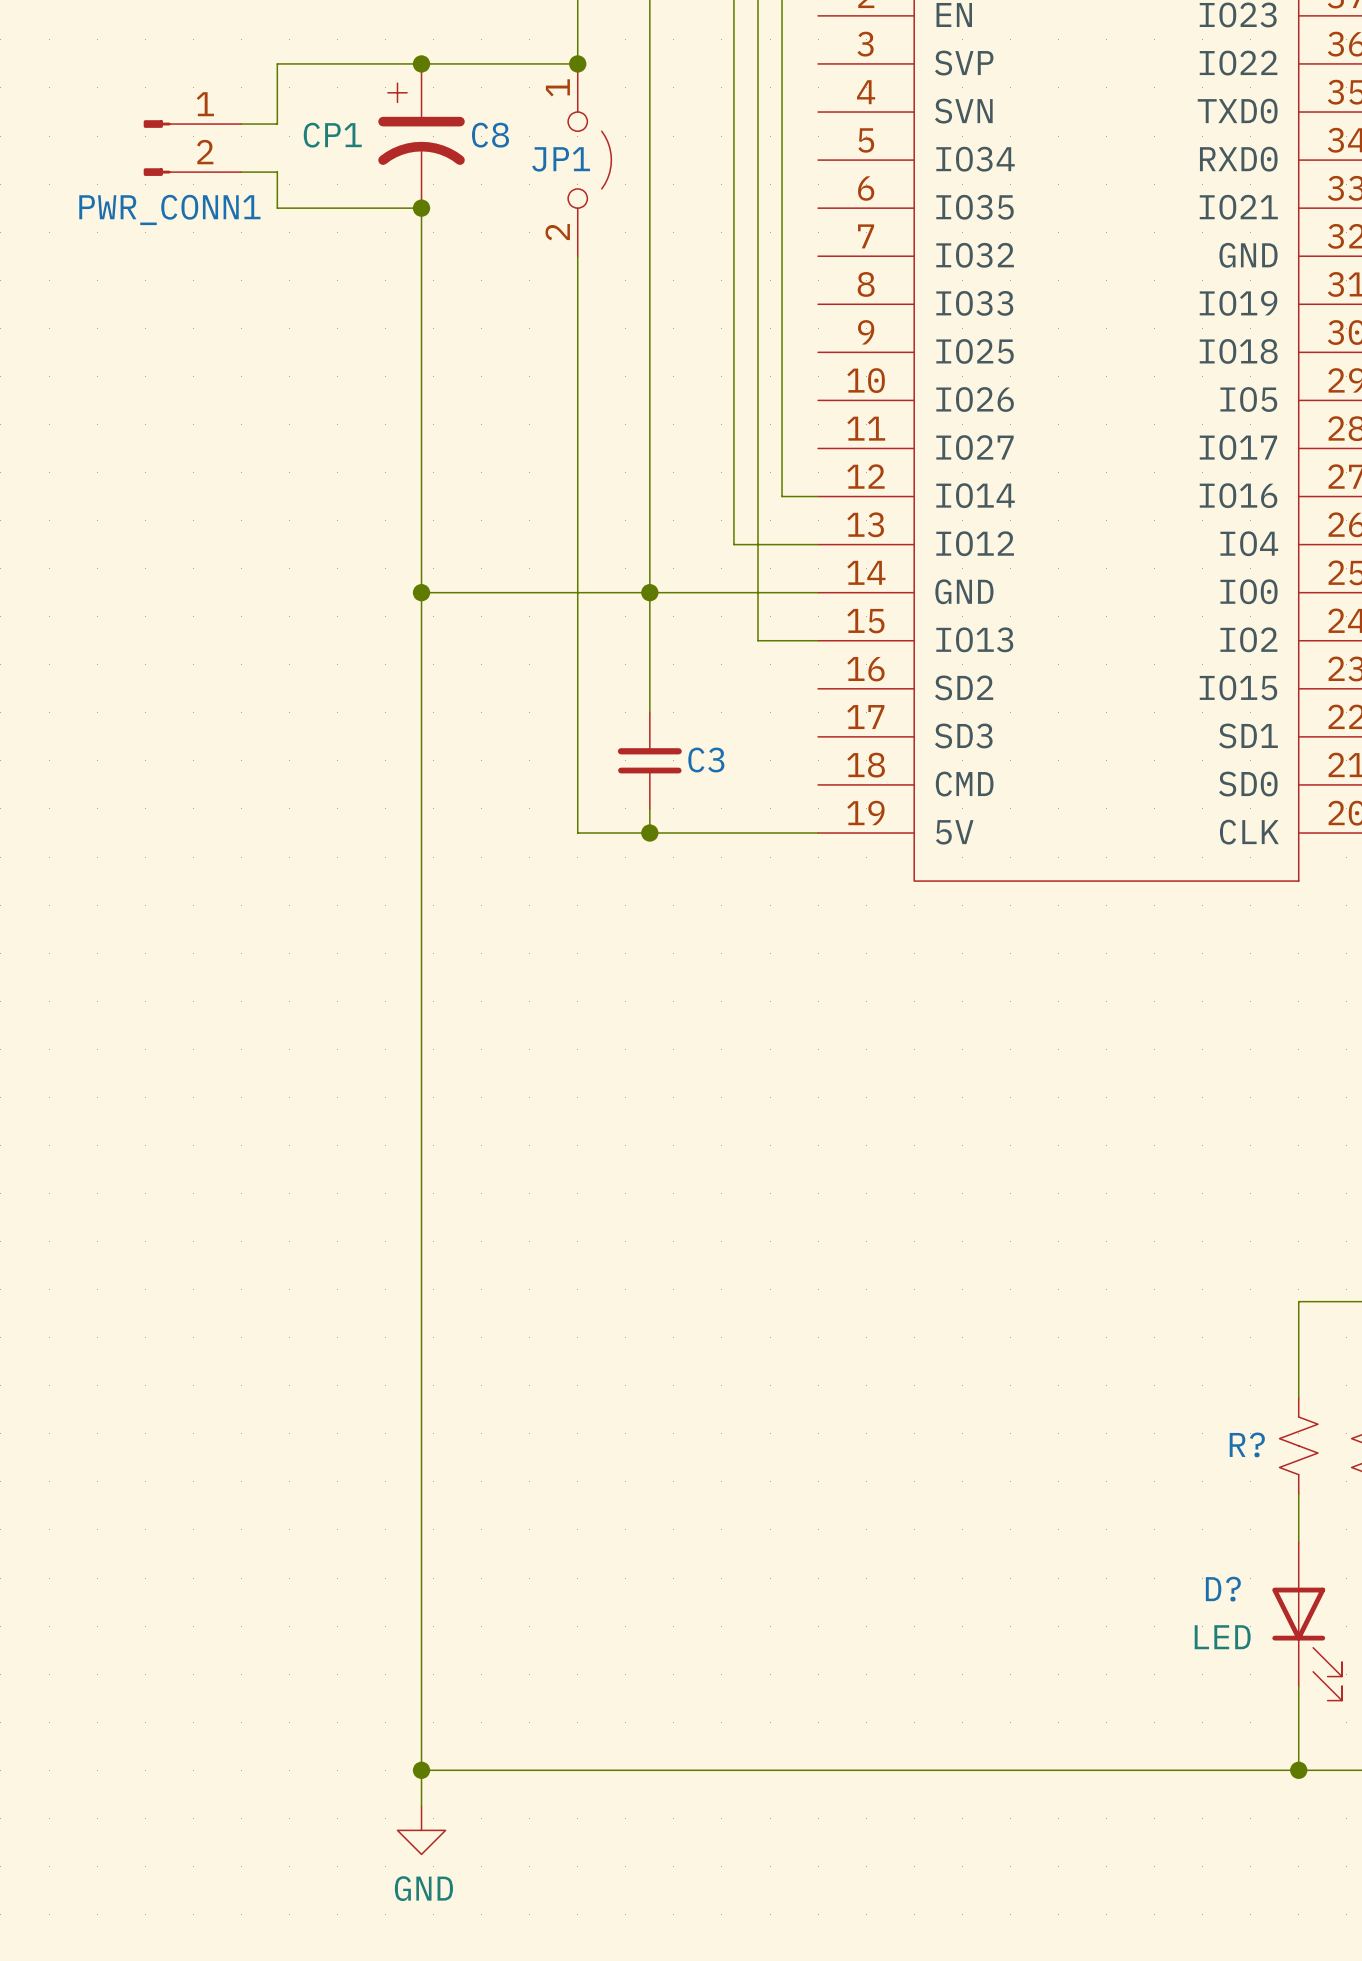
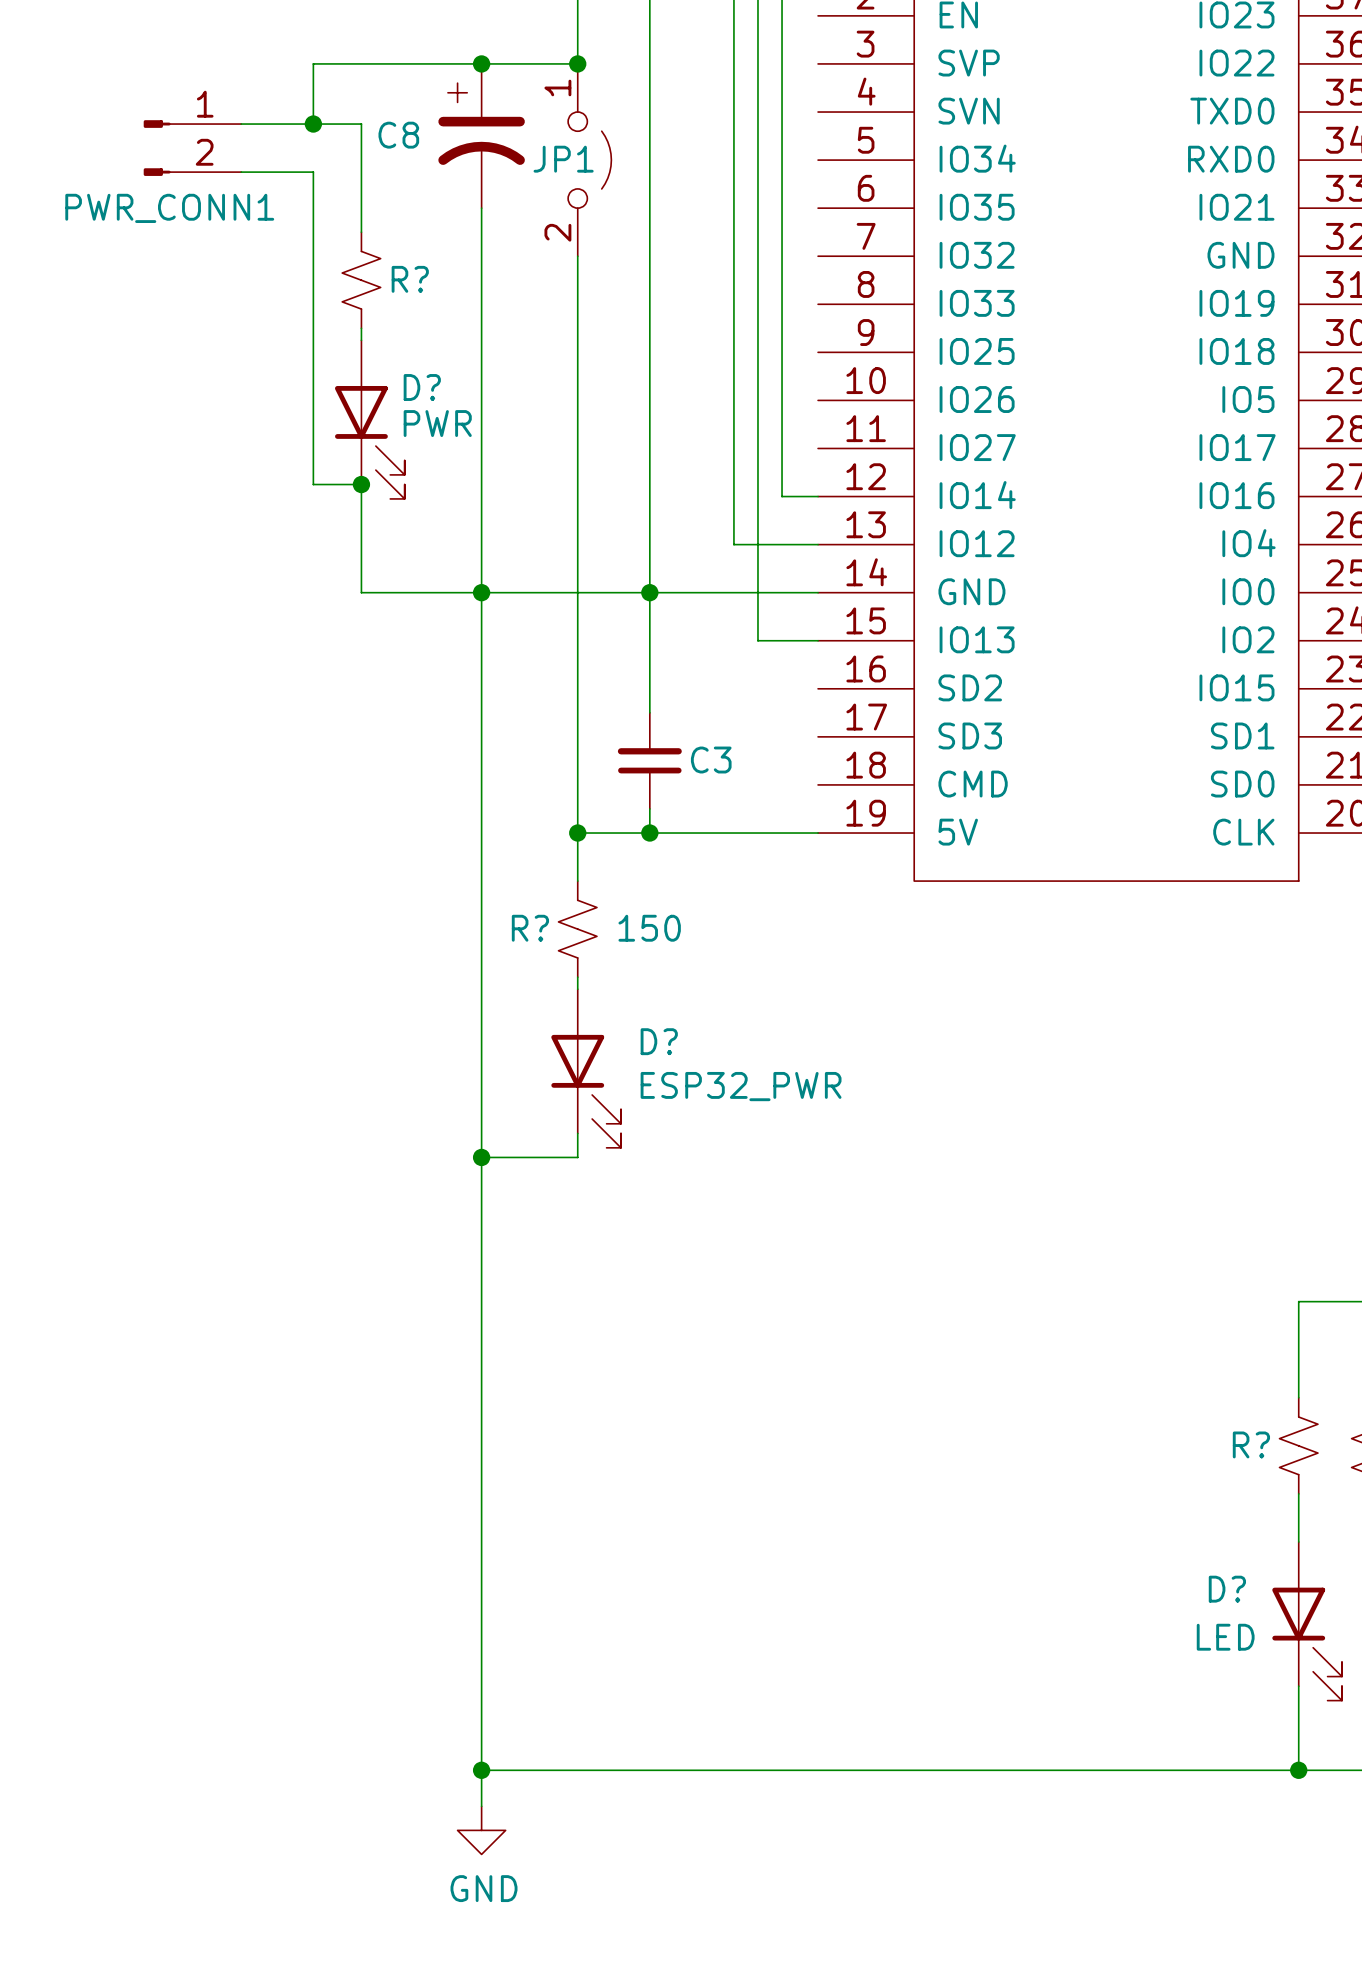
wire: (313, 63) (277, 63) (277, 124) -> (313, 63) (313, 124)
junction position: (421, 63) -> (481, 63)
wire: none -> (277, 124) (361, 124) (361, 232)
junction: none -> (313, 124)
C8 value: CP1 (332, 135) -> none
C8 name position: C8 (490, 135) -> C8 (398, 135)
C8 position: (421, 136) -> (481, 136)
wire: (277, 172) (277, 208) (421, 208) (421, 1806) -> (277, 172) (313, 172) (313, 484) (361, 484) (361, 592) (421, 592)
junction: (421, 208) -> none
wire: none -> (481, 208) (481, 1806)
R?: none -> (361, 280)
wire: none -> (361, 328) (361, 340)
D?: none -> PWR (369, 419)
junction: none -> (361, 484)
junction position: (421, 592) -> (481, 592)
wire: none -> (577, 833) (577, 881)
junction: none -> (577, 833)
R?: none -> 150 (577, 929)
wire: none -> (577, 977) (577, 989)
D?: none -> ESP32_PWR (586, 1068)
wire: none -> (577, 1133) (577, 1157) (481, 1157)
junction: none -> (481, 1157)
wire: (421, 1770) (481, 1770) -> none
junction position: (421, 1770) -> (481, 1770)
power symbol position: GND (421, 1830) -> GND (481, 1830)

